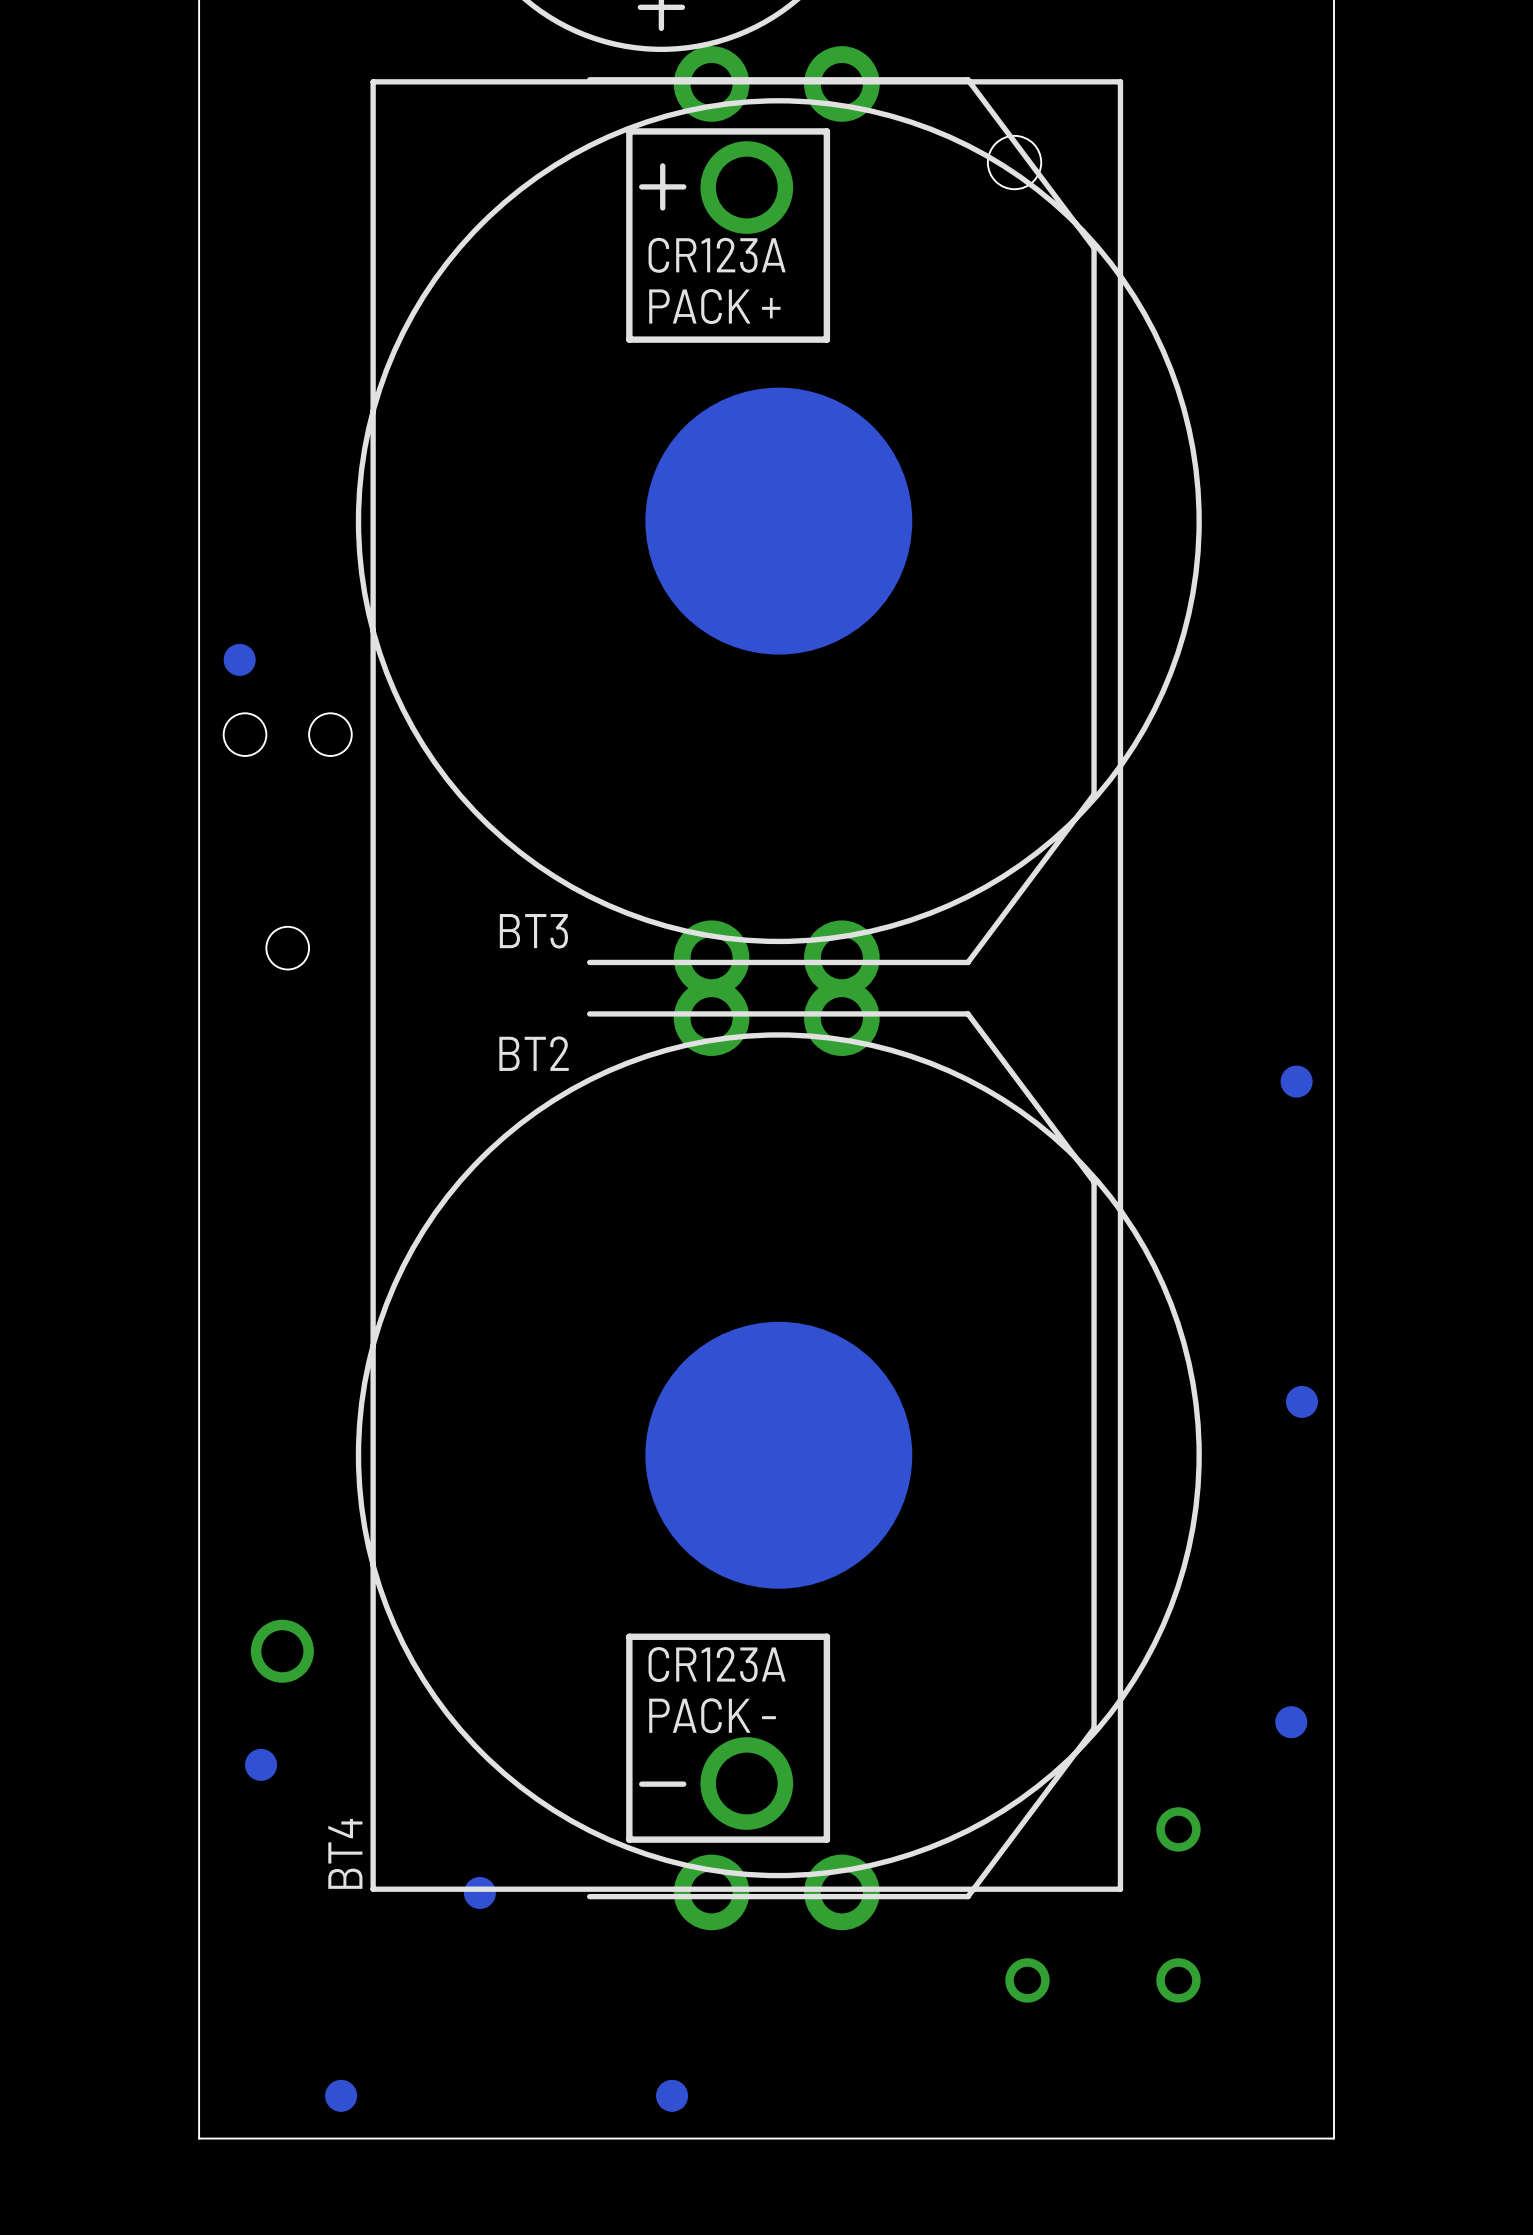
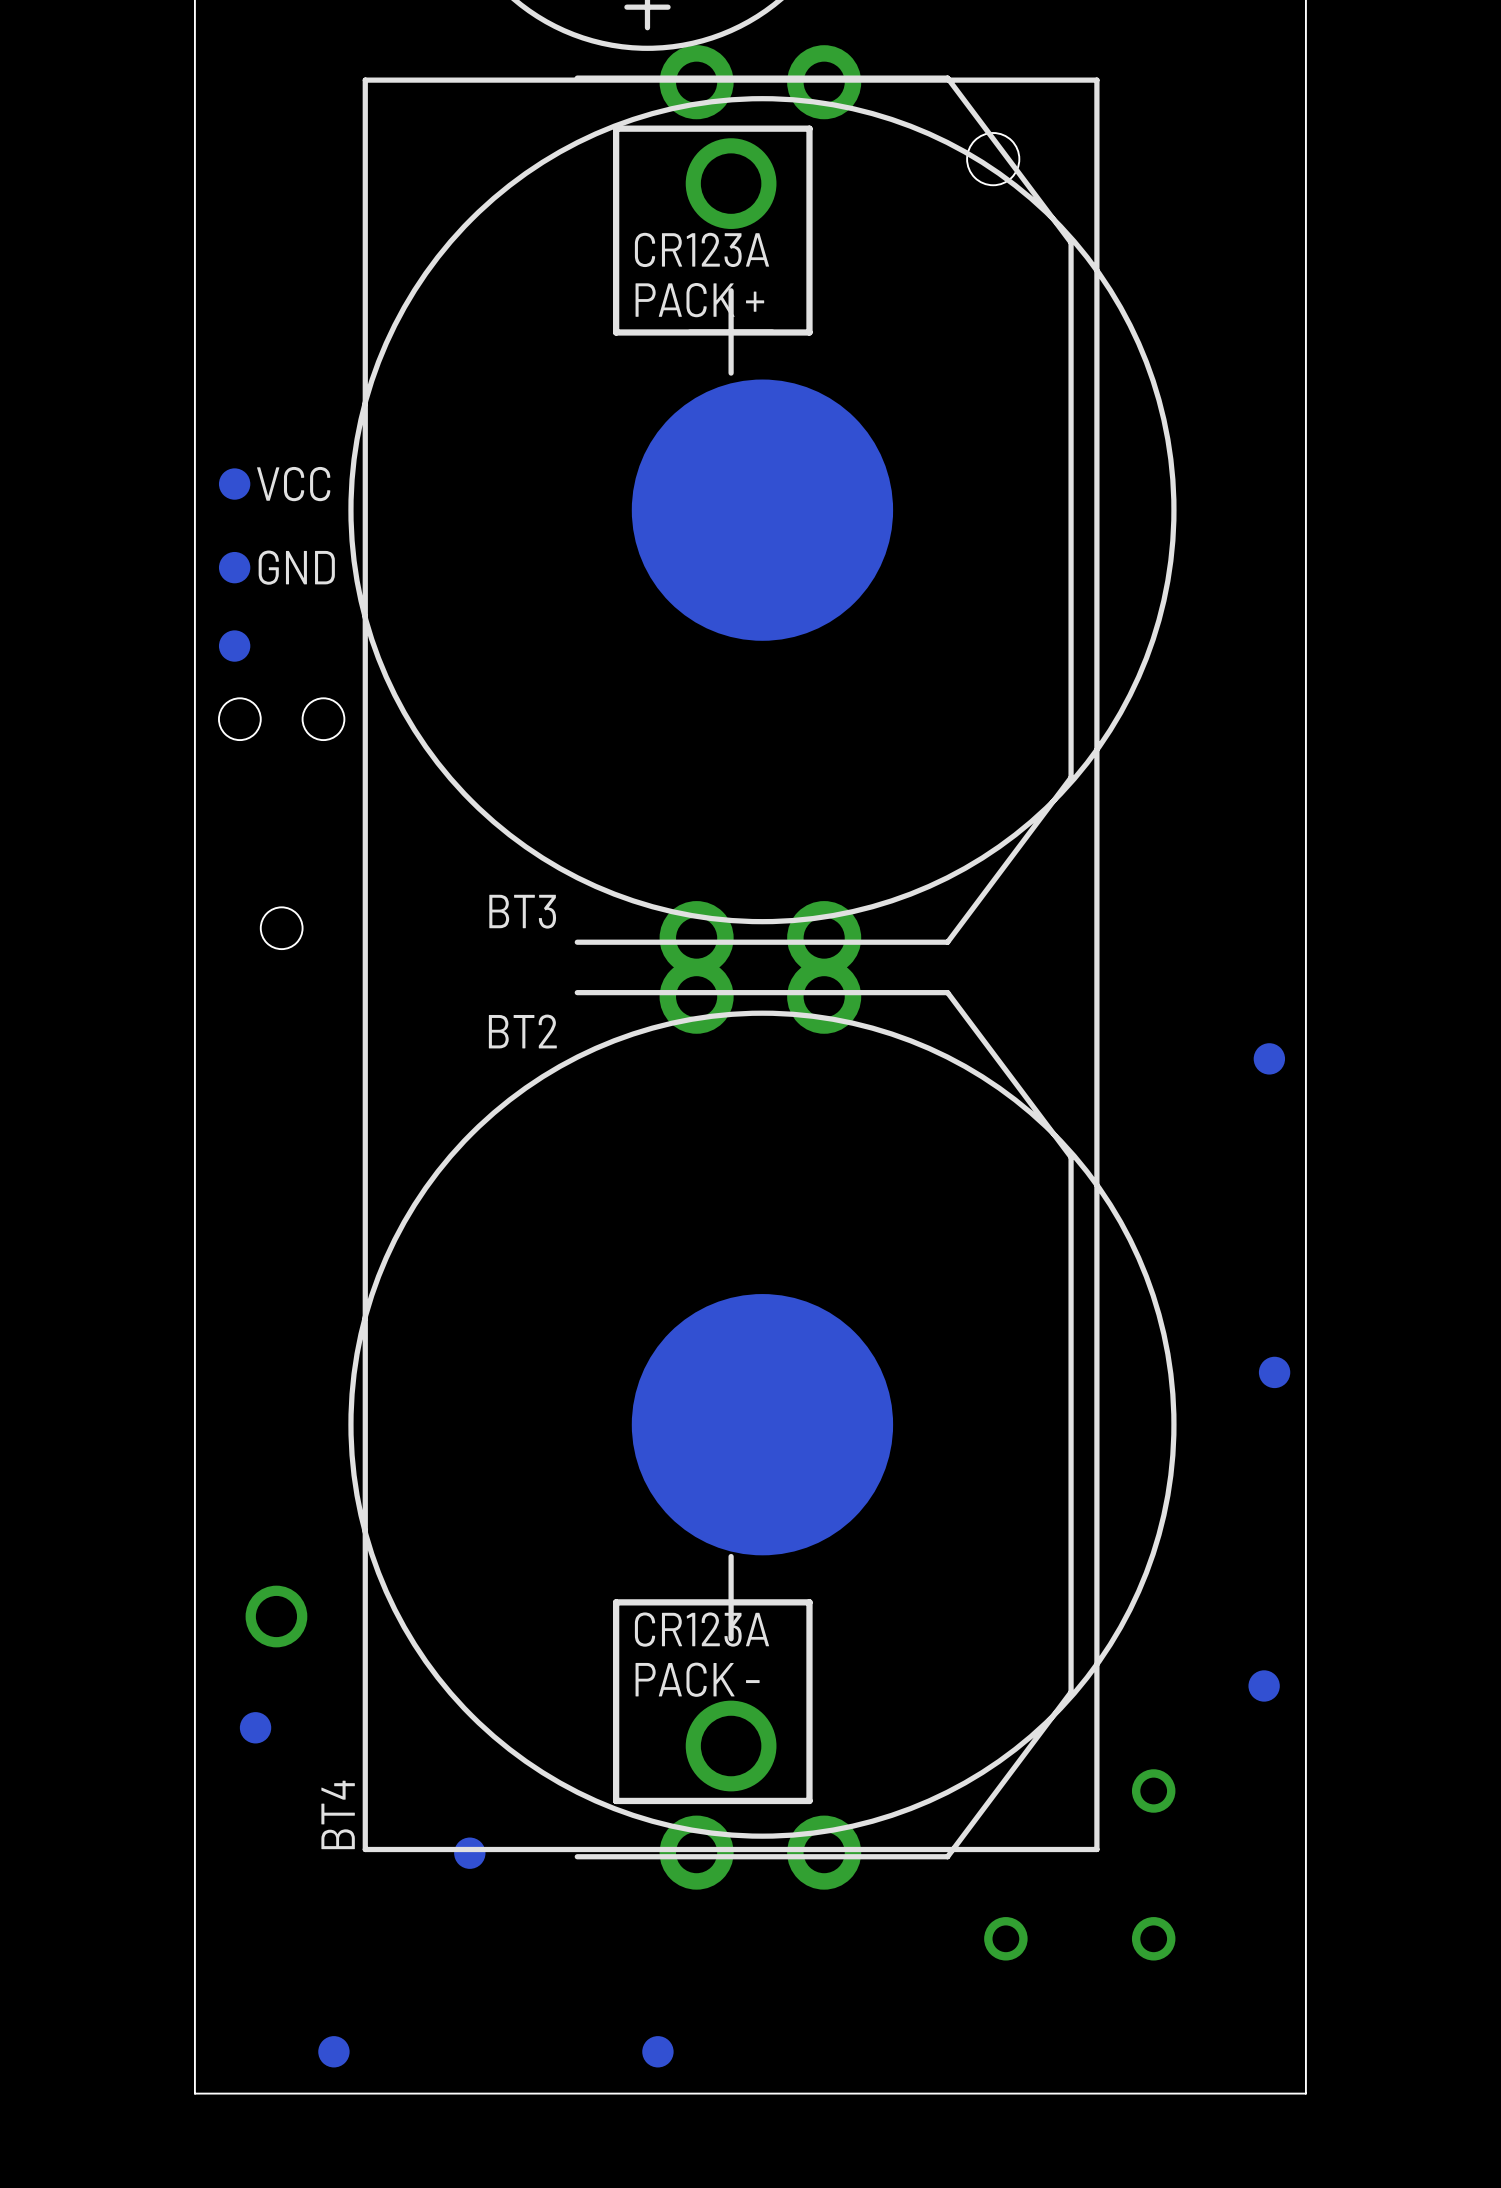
BT4 footprint: [370, 79, 1124, 1892] -> [362, 77, 1100, 1853]
part: none -> (234, 484)
text: none -> VCC (293, 484)
part: none -> (234, 567)
text: none -> GND (296, 567)

